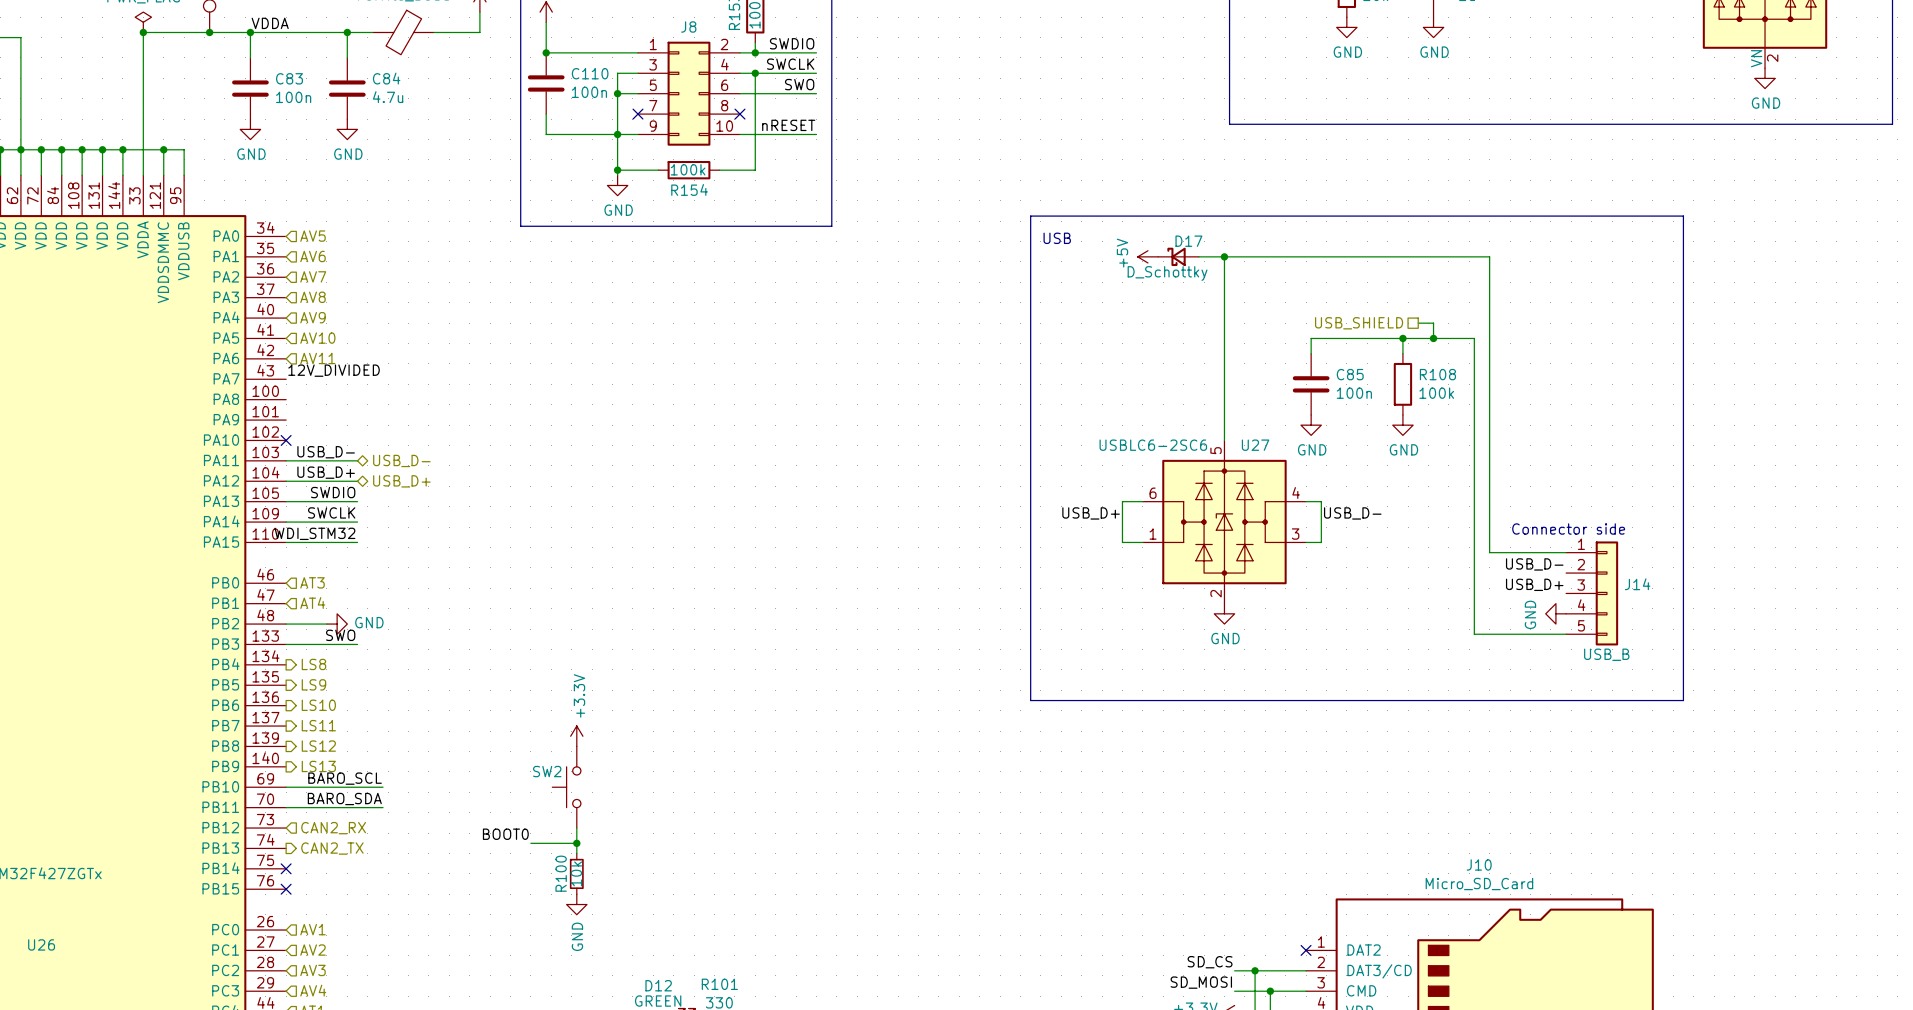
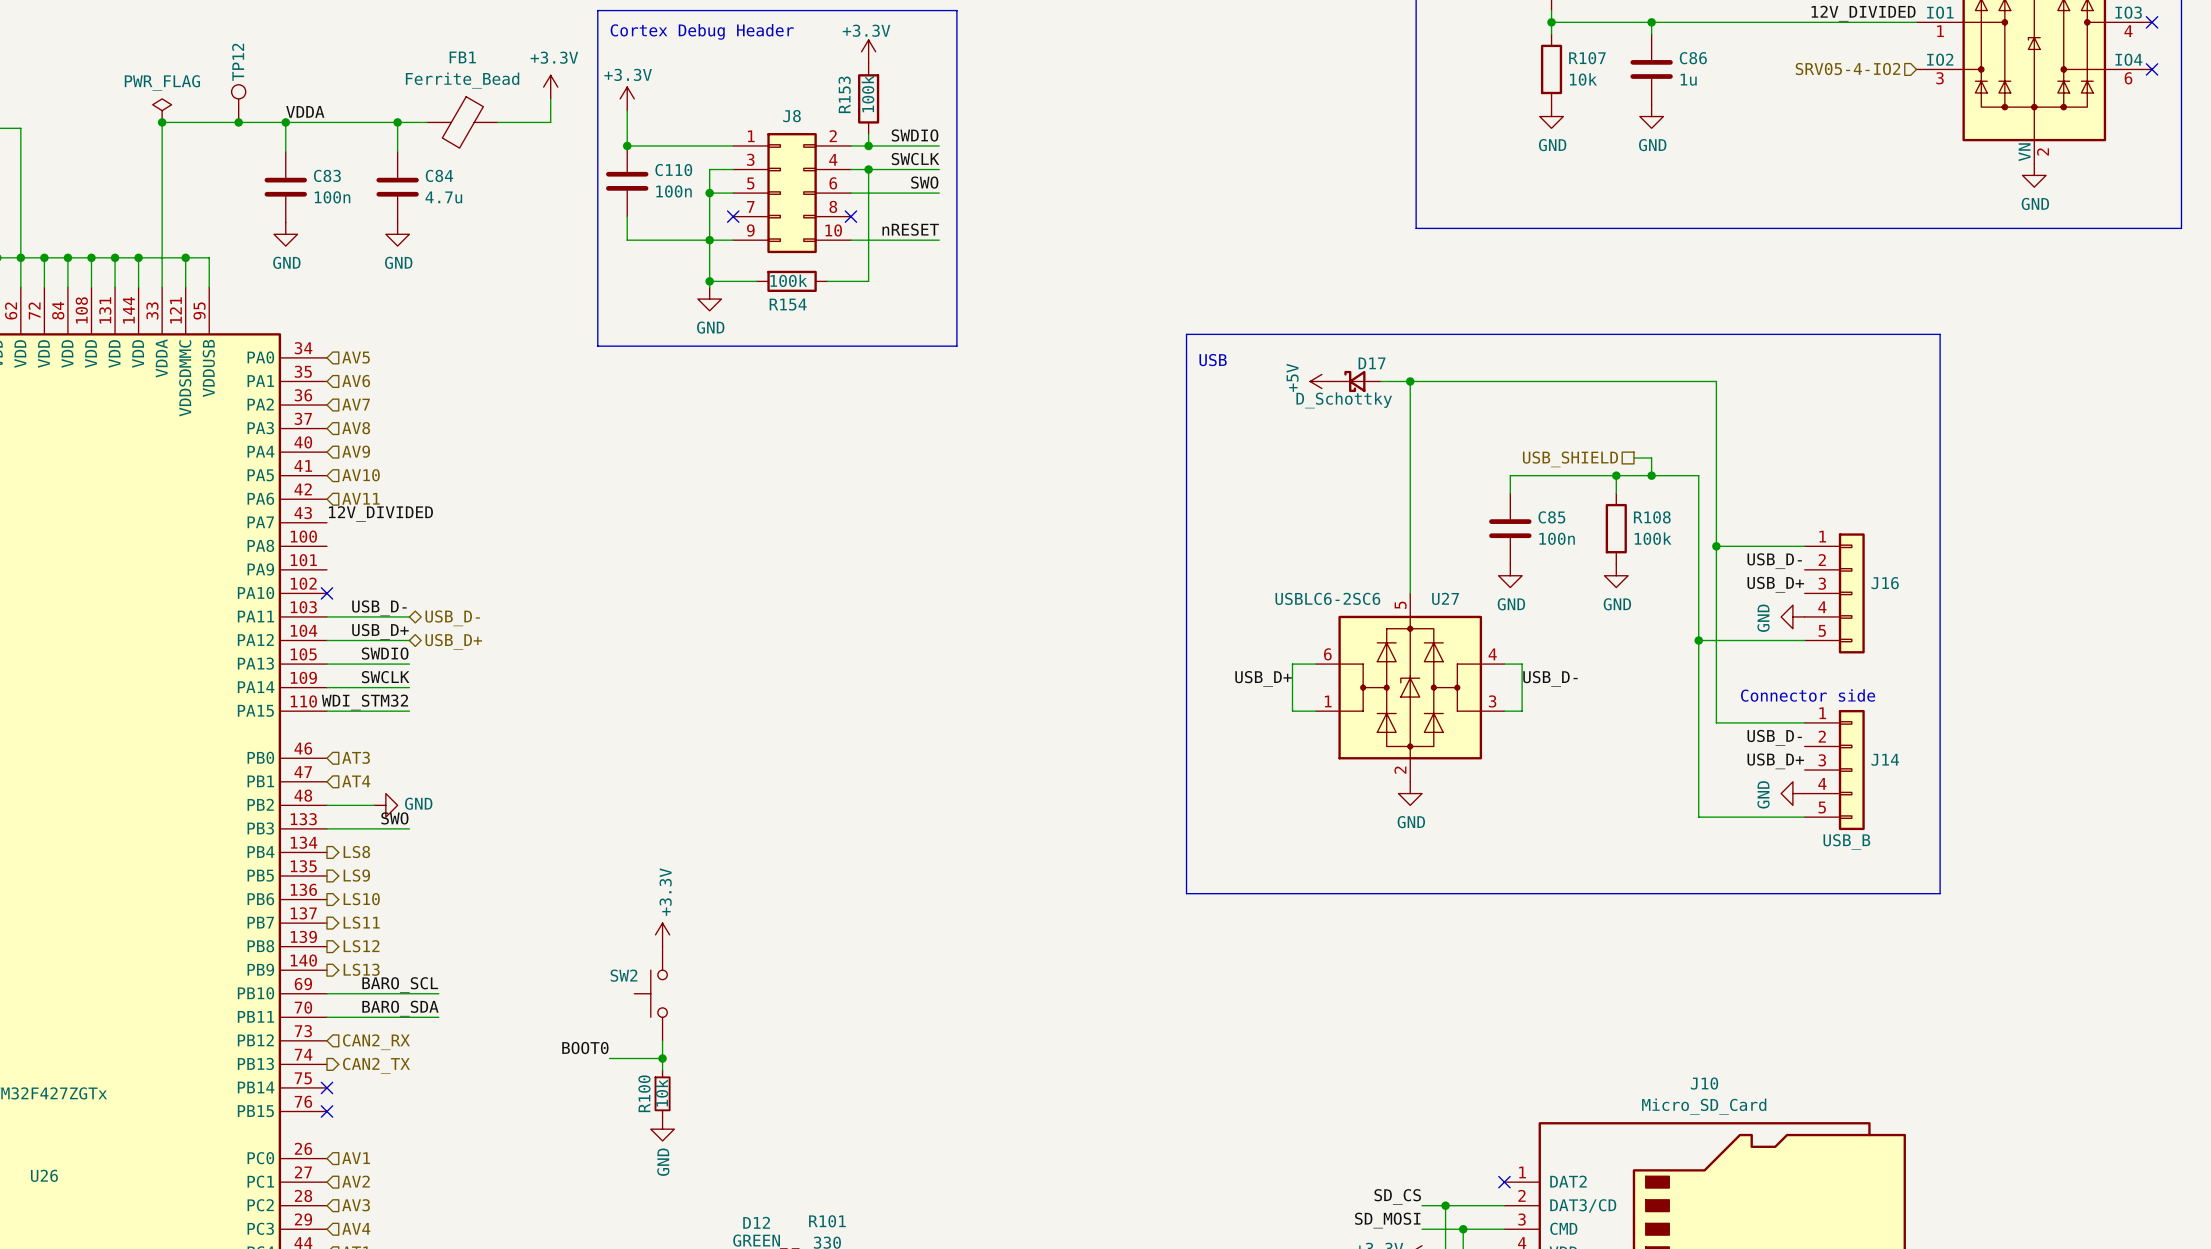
wire: none -> (1716, 546) (1804, 546)
junction: none -> (1716, 546)
label: none -> USB_D- (1774, 561)
label: none -> USB_D+ (1775, 584)
J16: none -> (1834, 593)
power symbol: none -> GND (1792, 616)
wire: none -> (1698, 640) (1804, 640)
junction: none -> (1698, 640)

